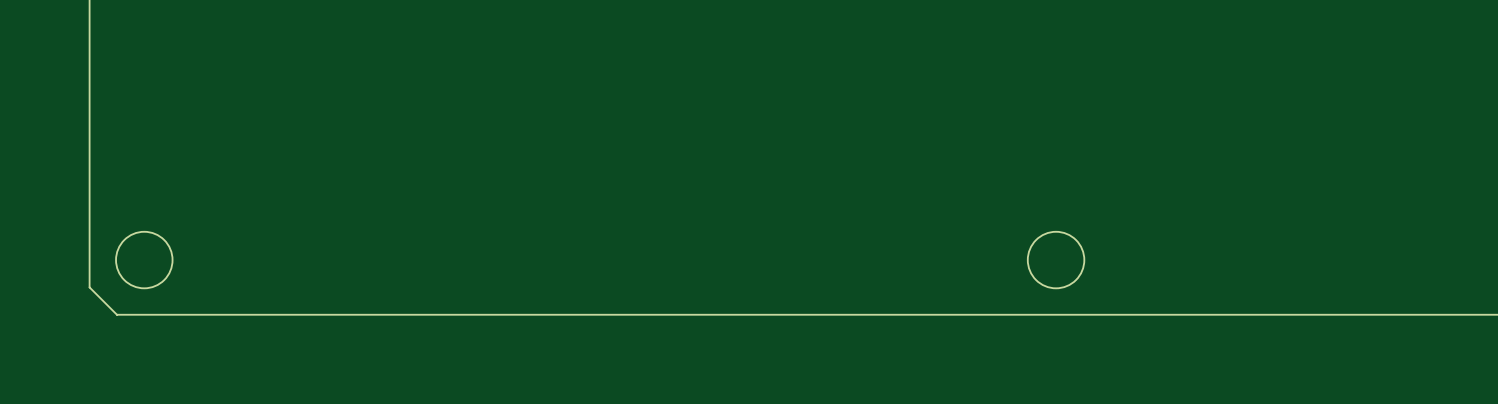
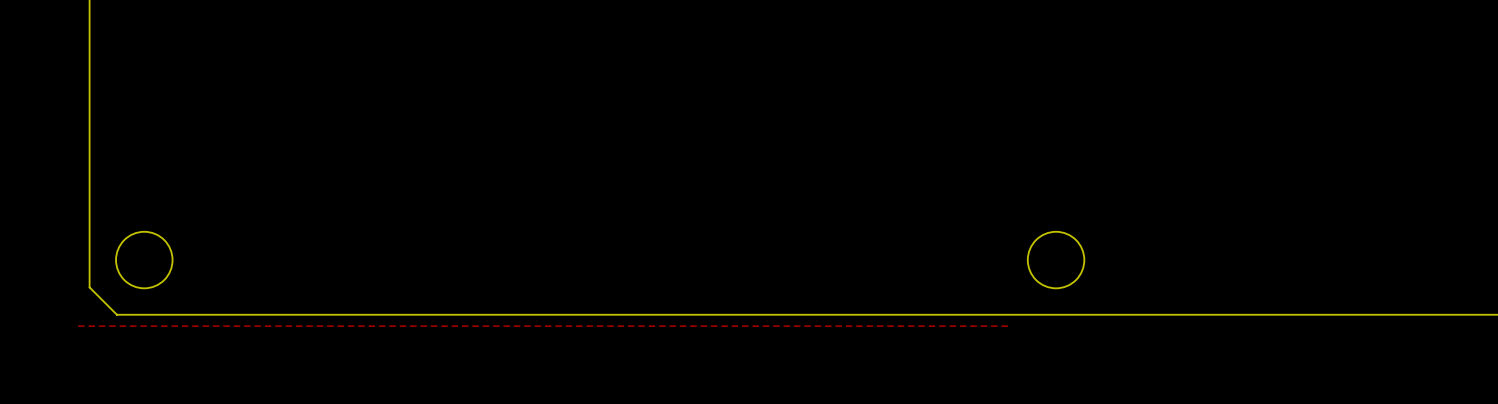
zone outline: none -> (78, 326) (1008, 326)

